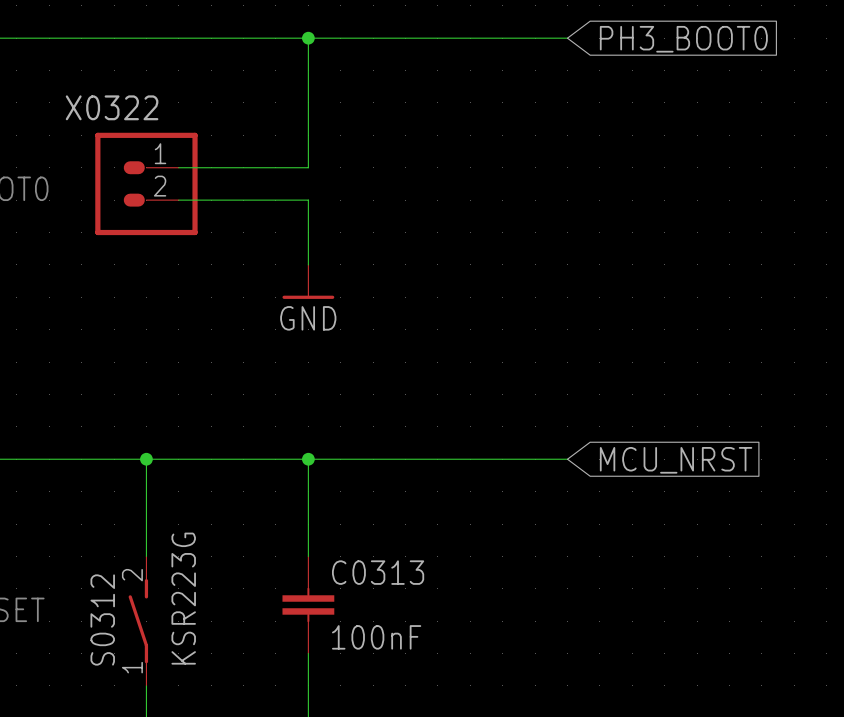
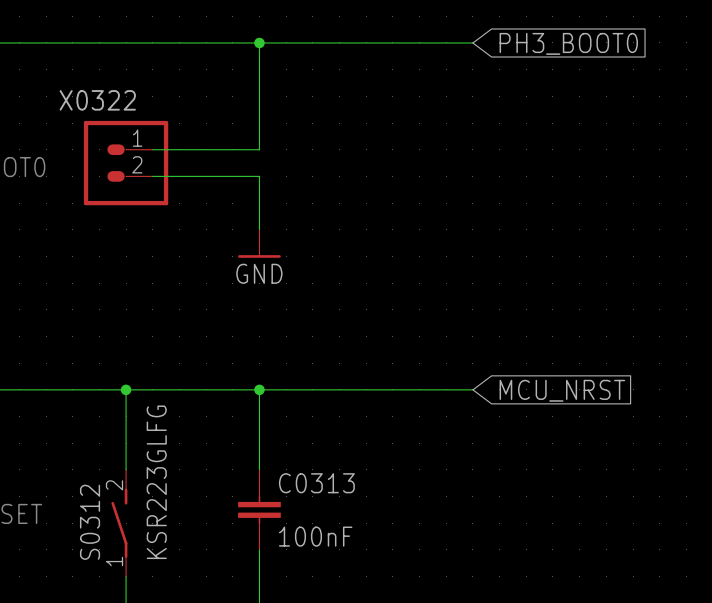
S0312 value: KSR223G (183, 598) -> KSR223GLFG (156, 482)

